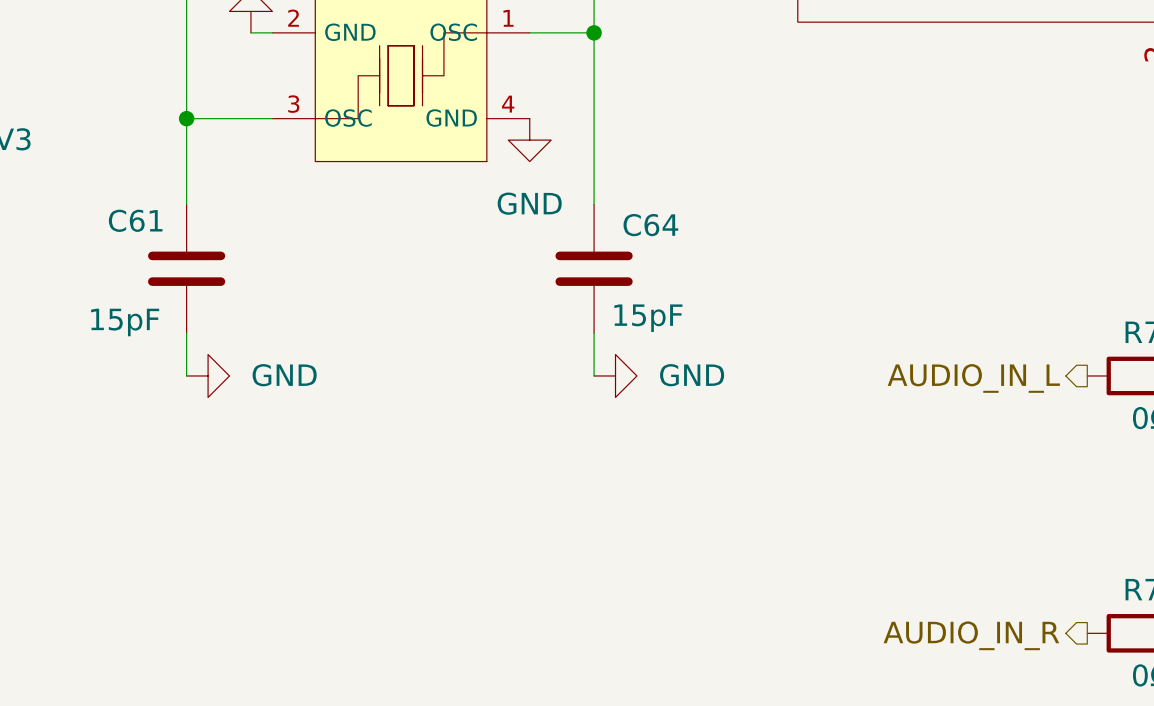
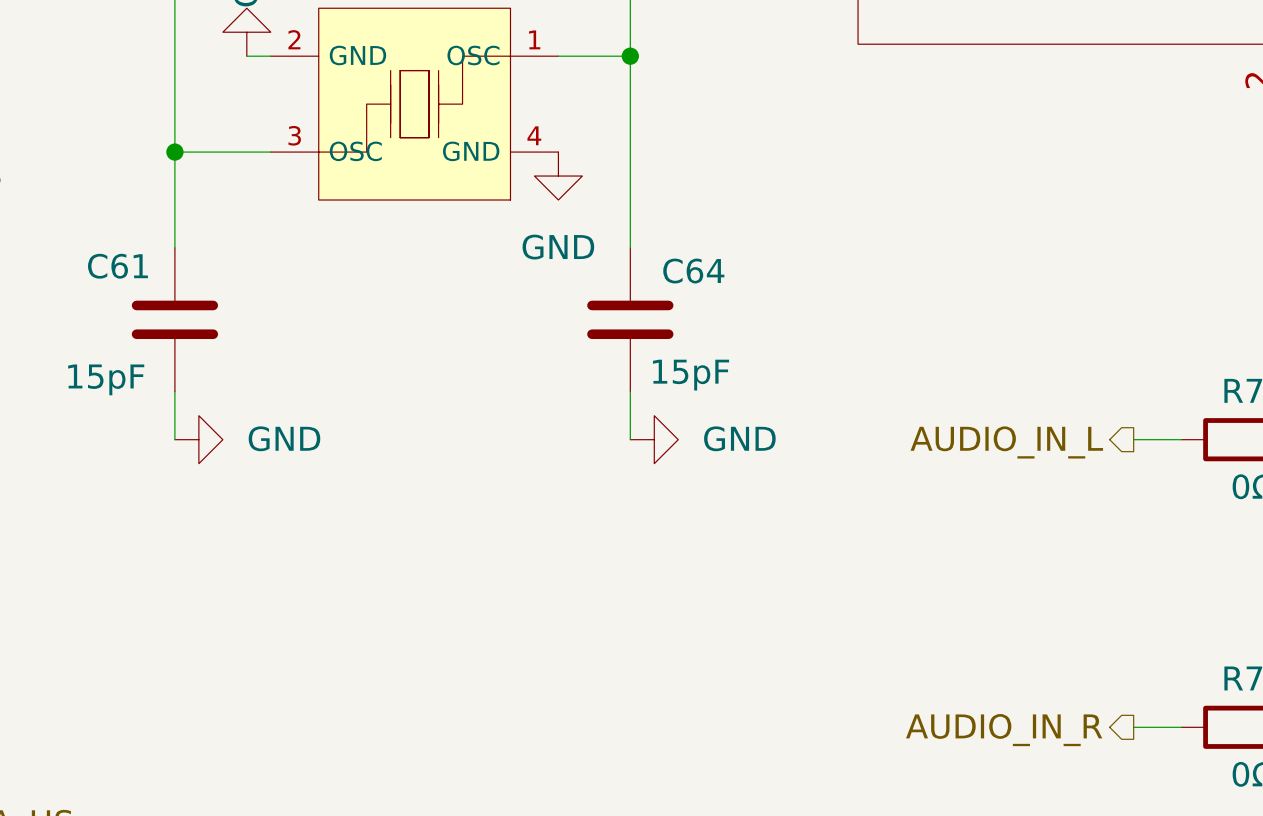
wire: none -> (1133, 439) (1181, 439)
hierarchical label position: AUDIO_IN_L (973, 378) -> AUDIO_IN_L (1006, 442)
wire: none -> (1133, 727) (1181, 727)
hierarchical label position: AUDIO_IN_R (971, 635) -> AUDIO_IN_R (1004, 730)

